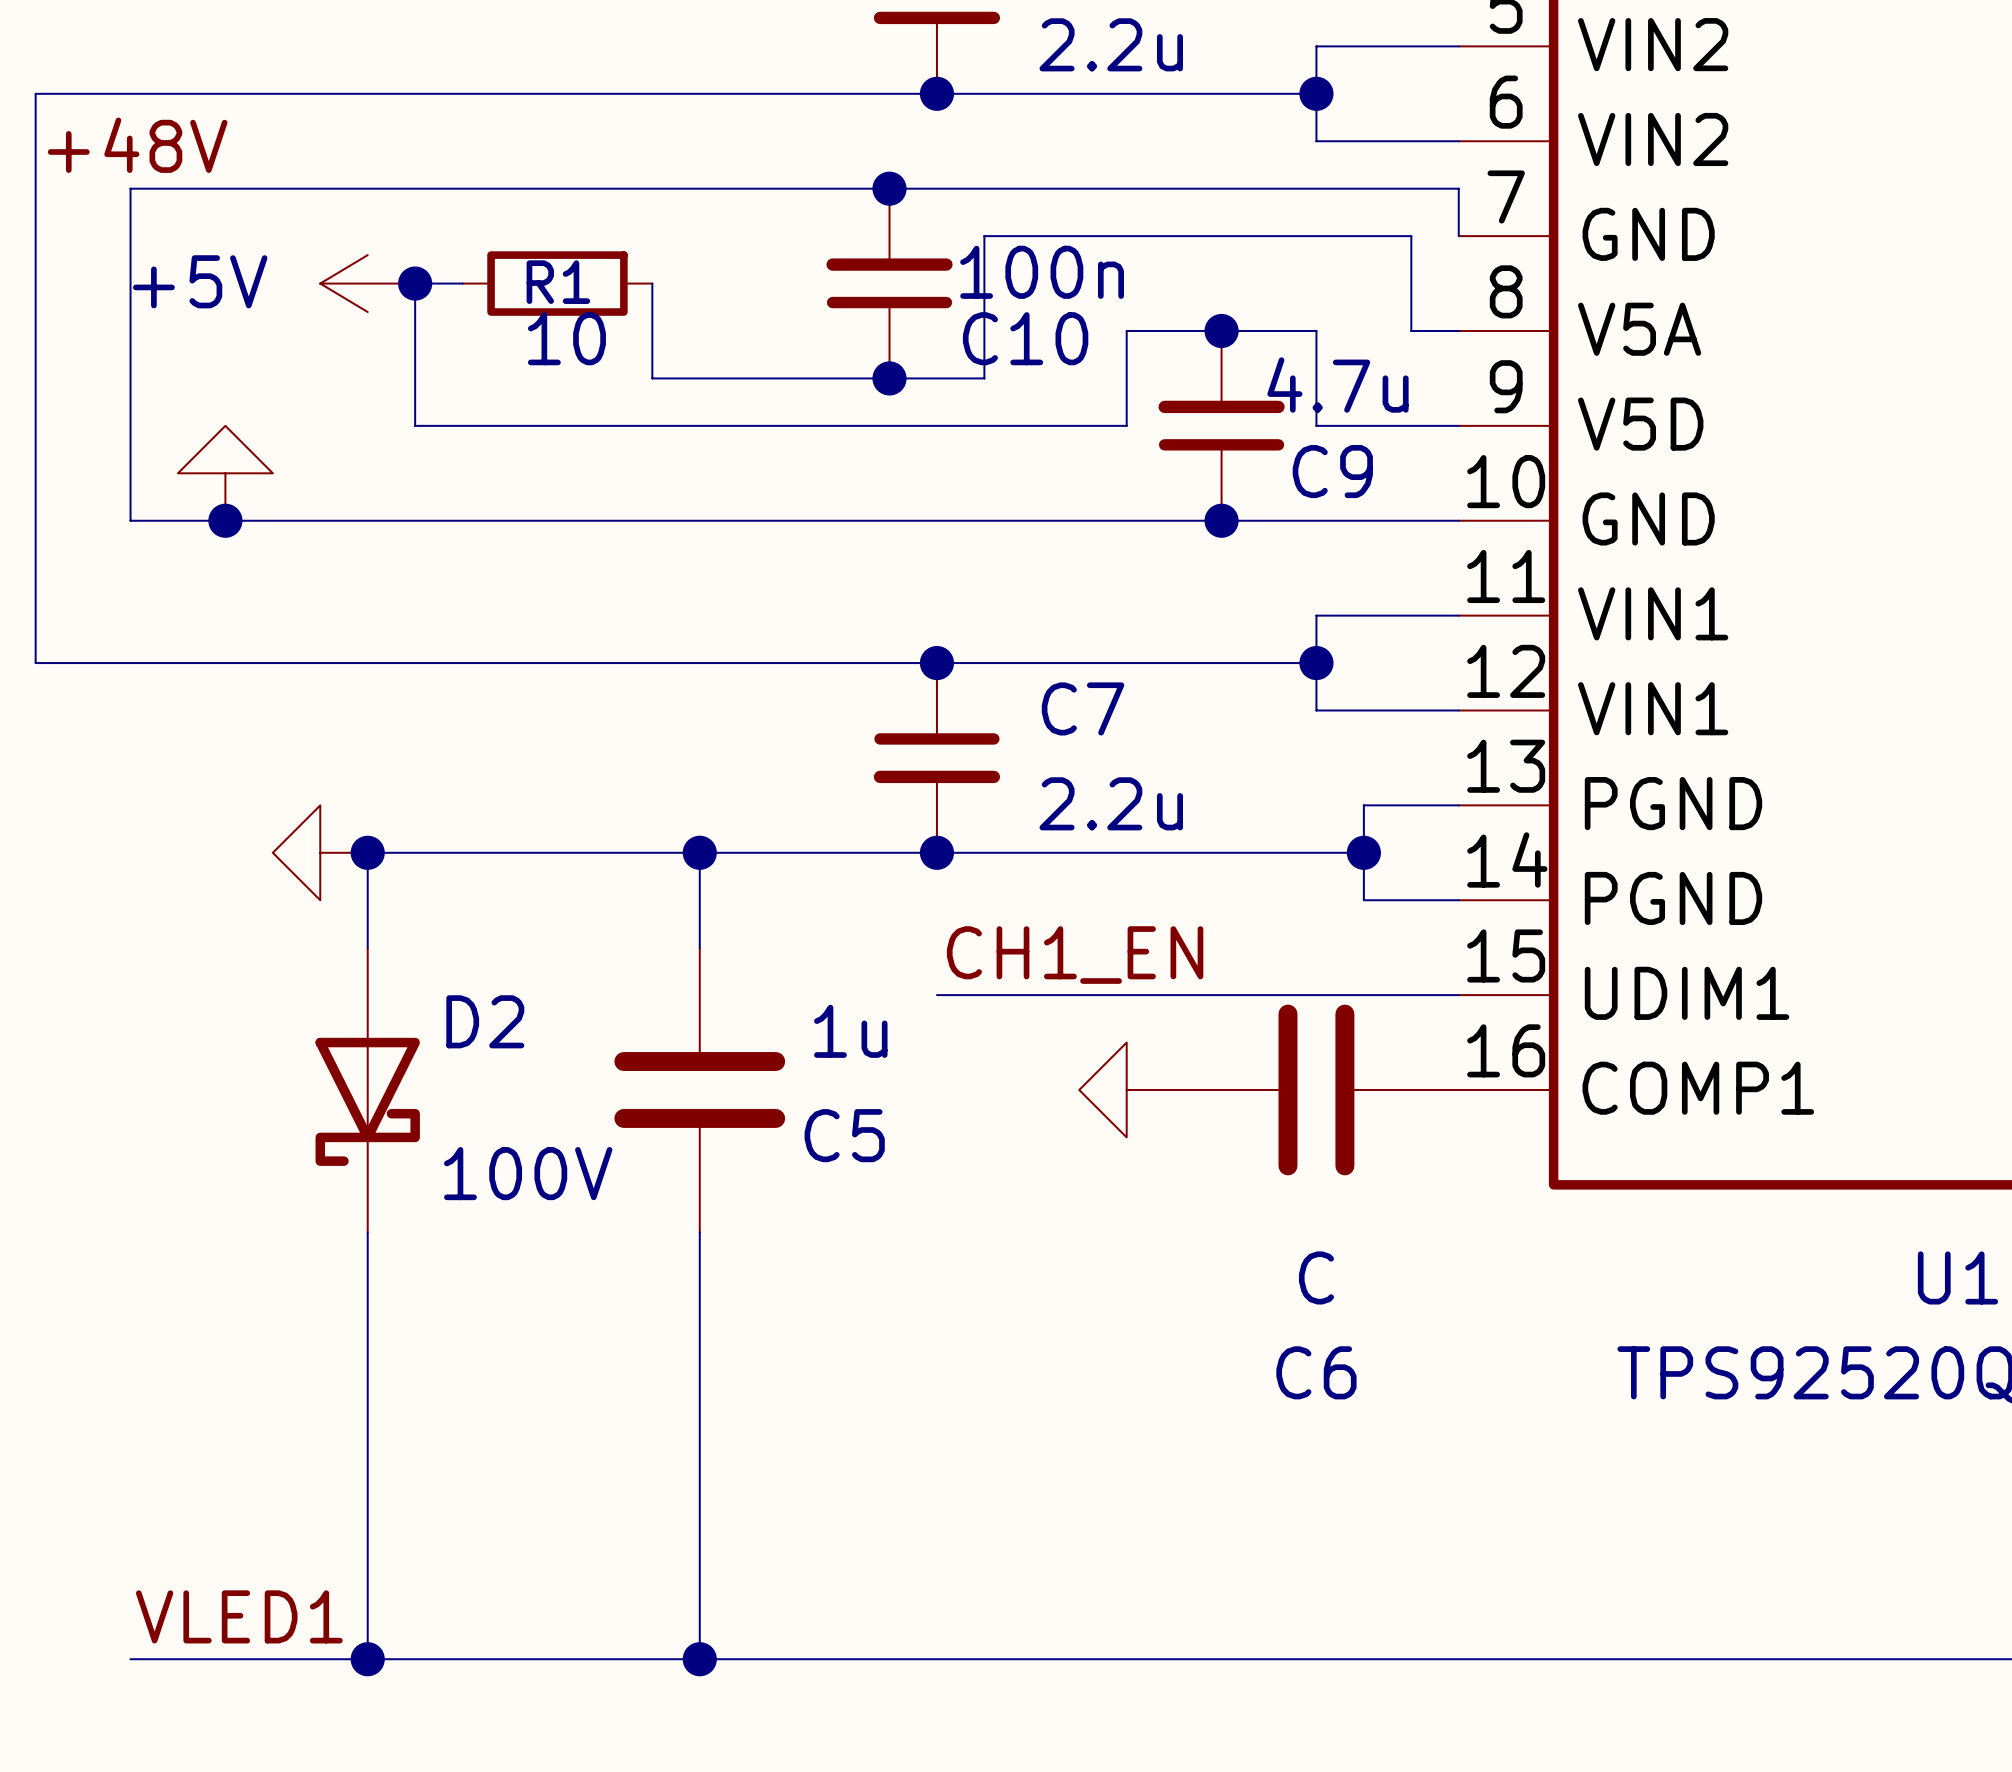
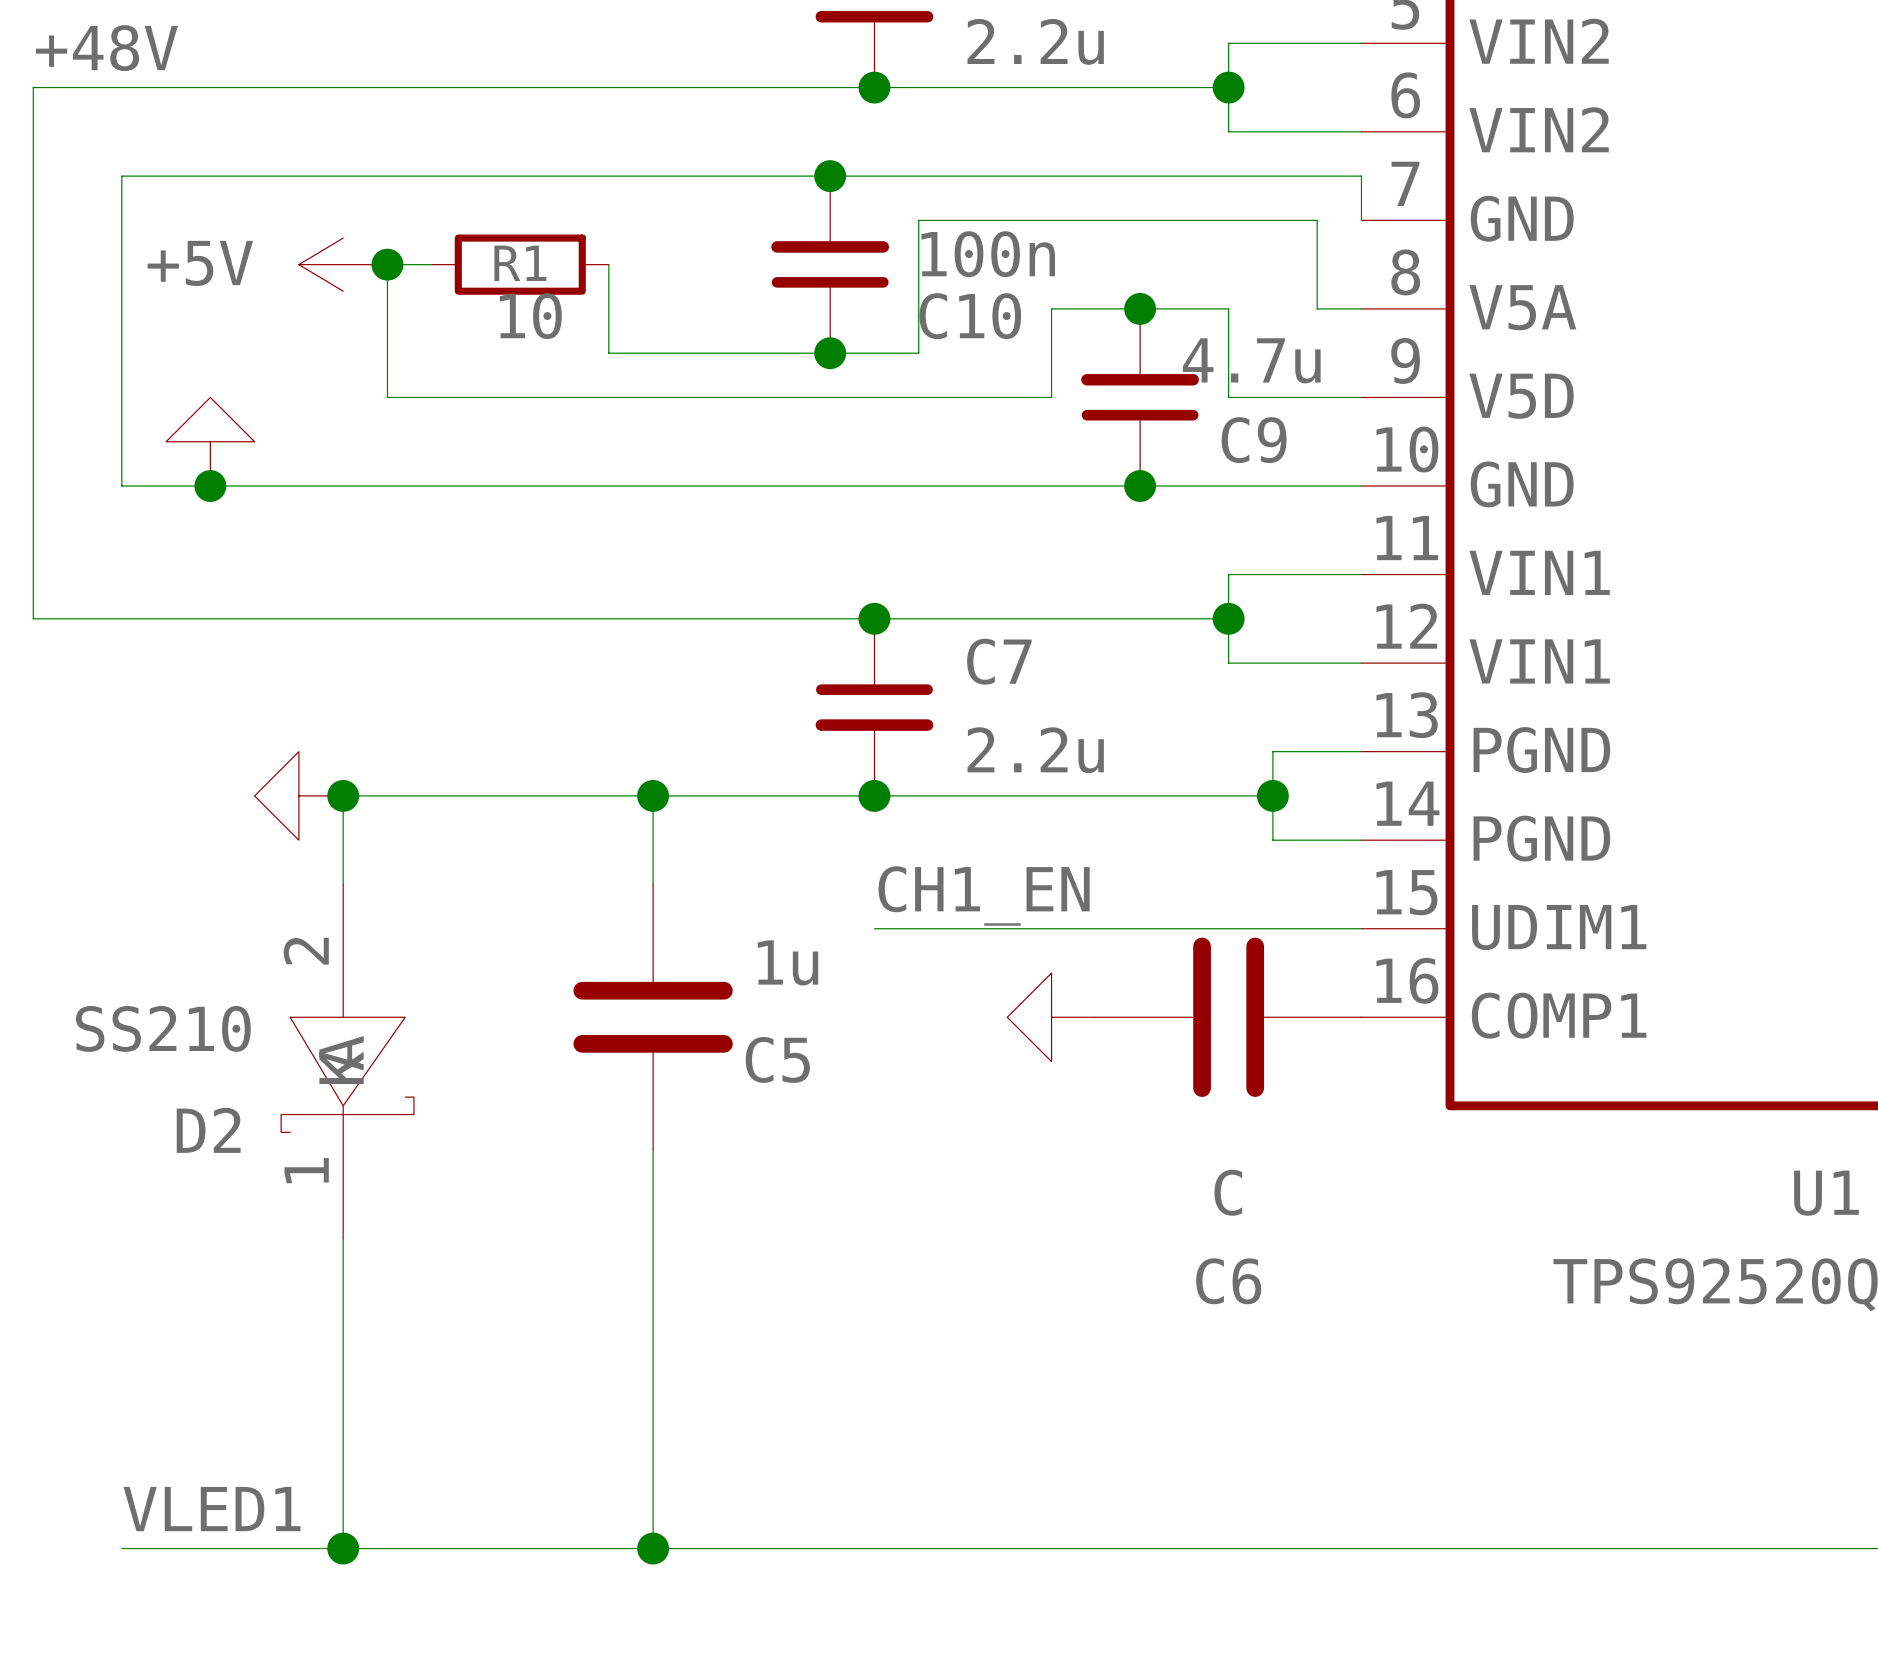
label position: +48V (137, 145) -> +48V (106, 48)
D2 symbol: [315, 947, 420, 1233] -> [281, 884, 414, 1239]
D2 name position: D2 (485, 1021) -> D2 (208, 1130)
D2 value: 100V (528, 1173) -> SS210 (163, 1028)

